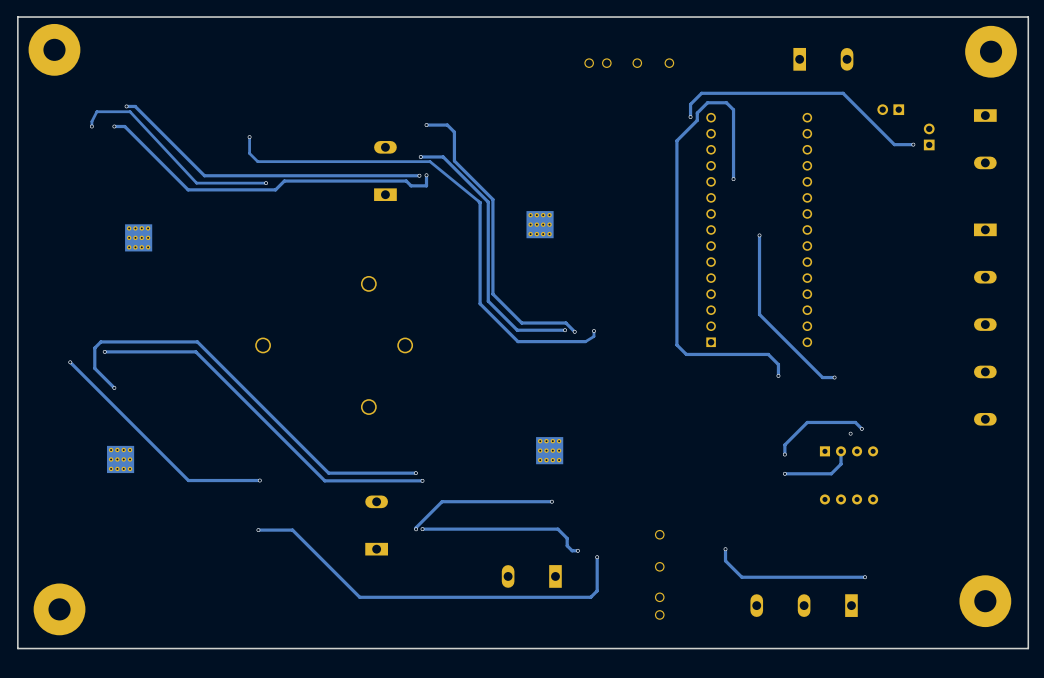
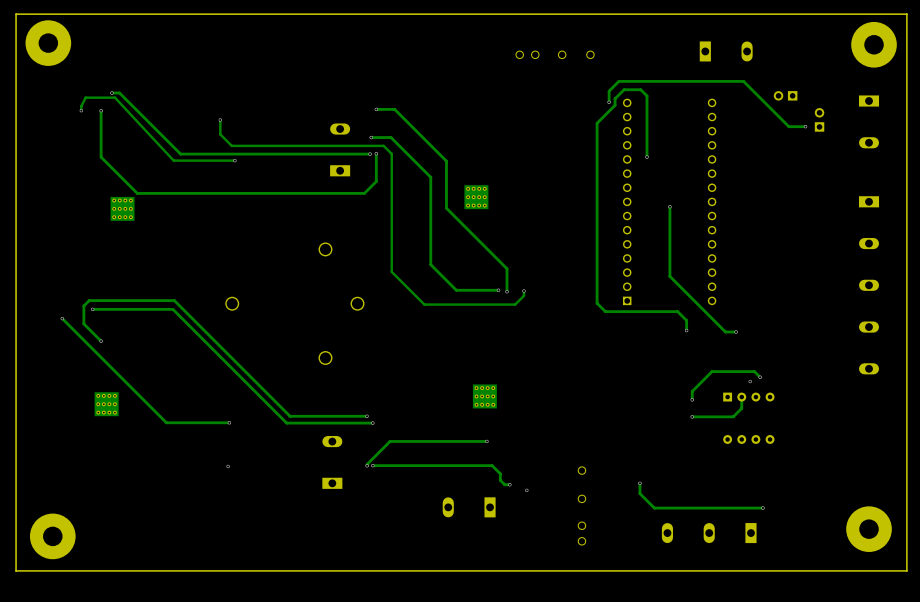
track: (114, 126) (124, 126) (188, 189) (275, 189) (284, 181) (406, 181) (411, 185) (426, 185) -> (101, 110) (101, 157) (137, 193) (364, 193) (376, 181) (376, 163)
track: (454, 132) (454, 160) (492, 199) (492, 294) (521, 323) (565, 323) (574, 331) -> (400, 115) (446, 161) (446, 208) (507, 268) (507, 291)
track: (257, 161) (430, 161) (479, 202) -> (227, 141) (231, 145) (383, 145) (391, 153) (391, 271) (424, 304) (515, 304) (523, 295)
track: (479, 202) (480, 303) (517, 341) (585, 341) (593, 336) -> none
track: (258, 530) (292, 530) (359, 597) (590, 597) (597, 590) (597, 557) -> none

